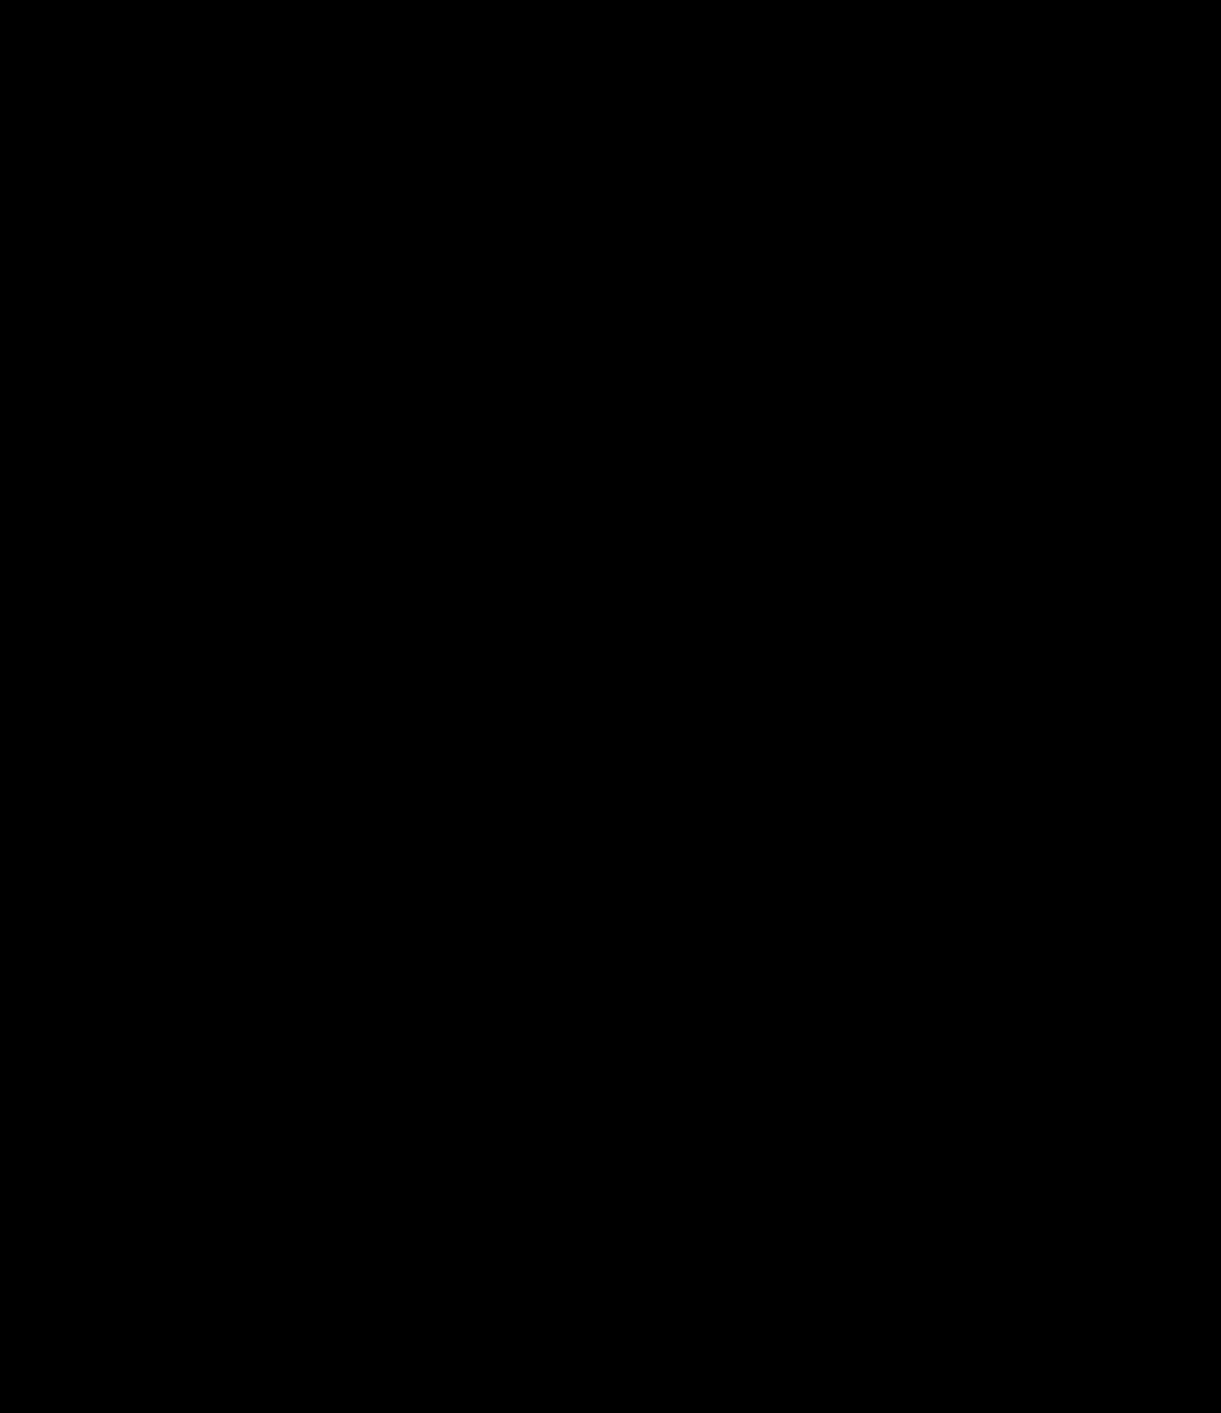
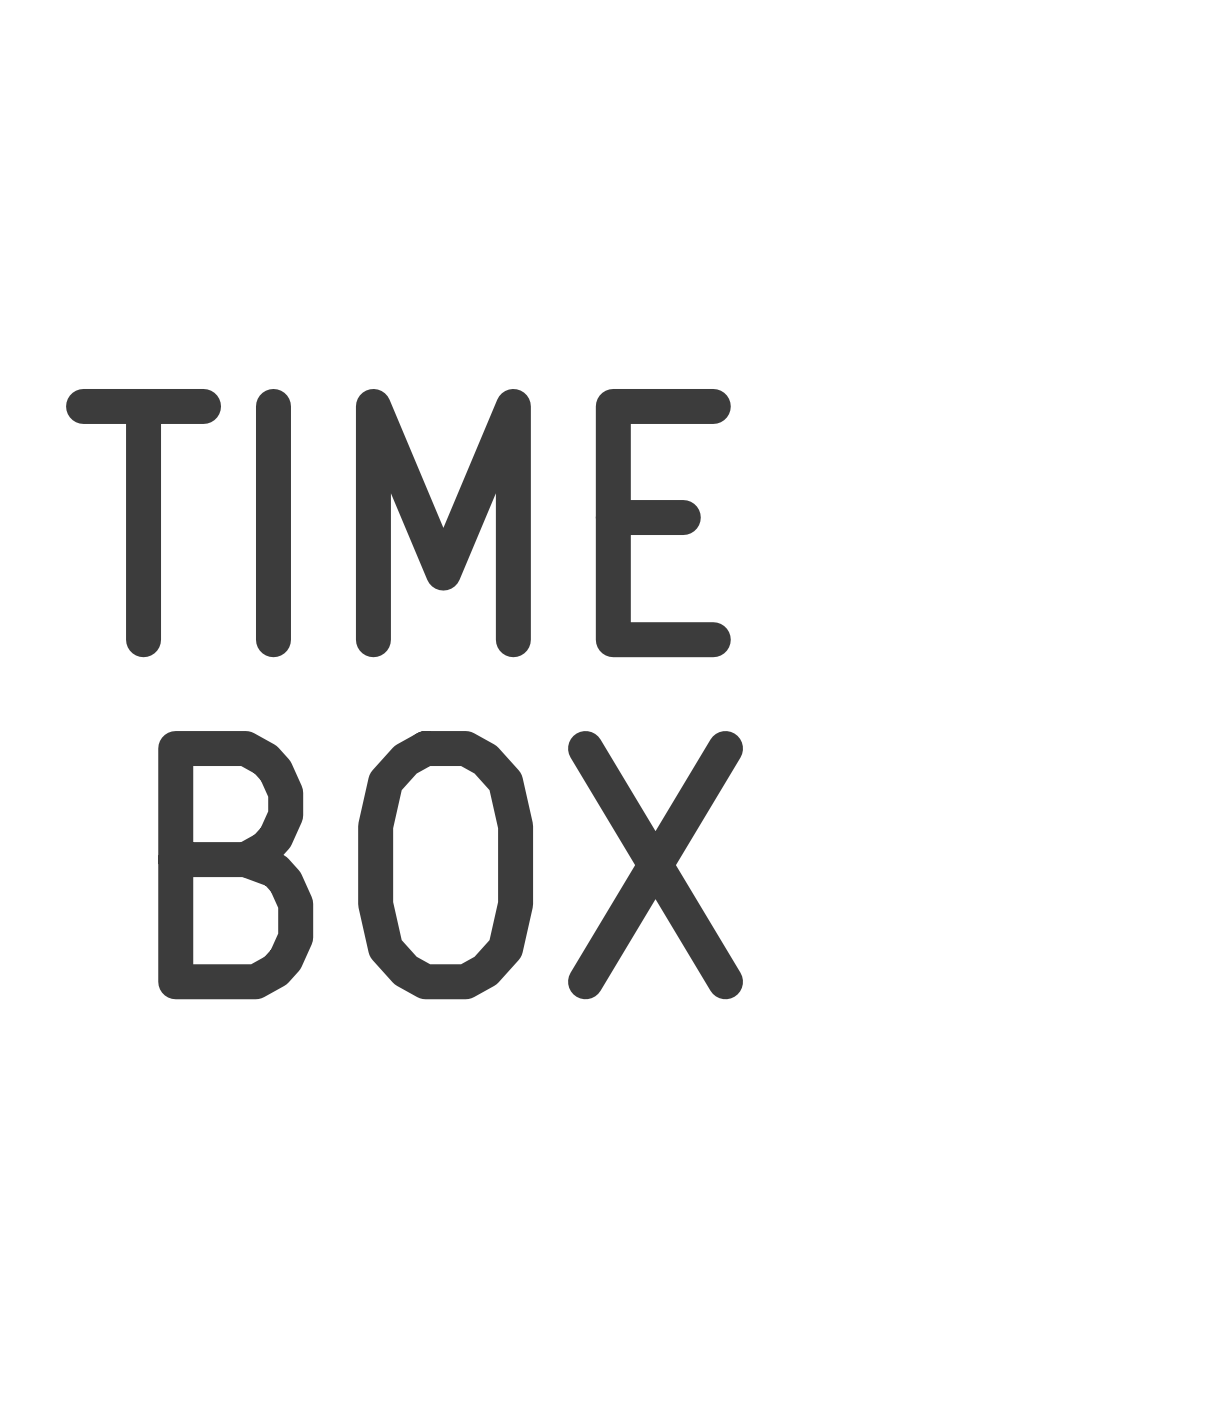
text: none -> TIME (398, 523)
text: none -> BOX (450, 865)

